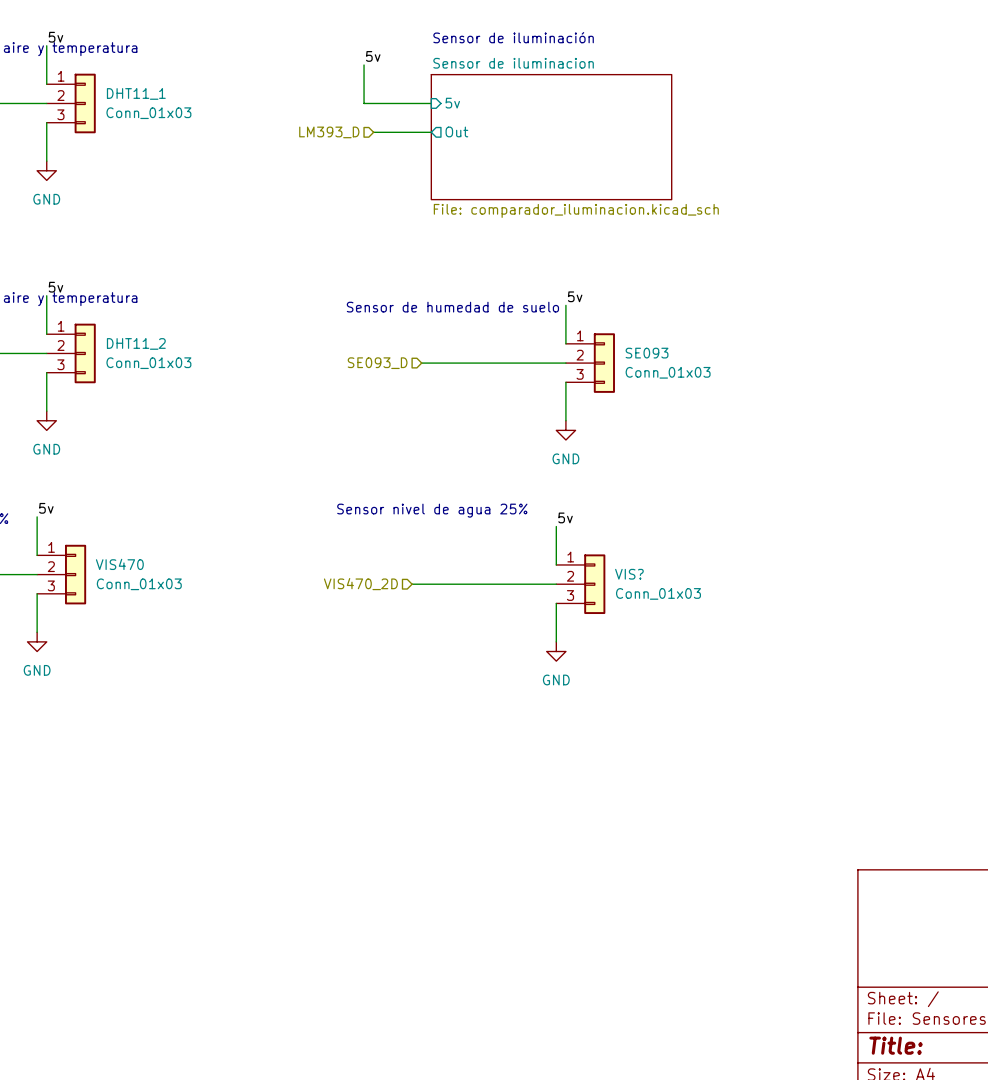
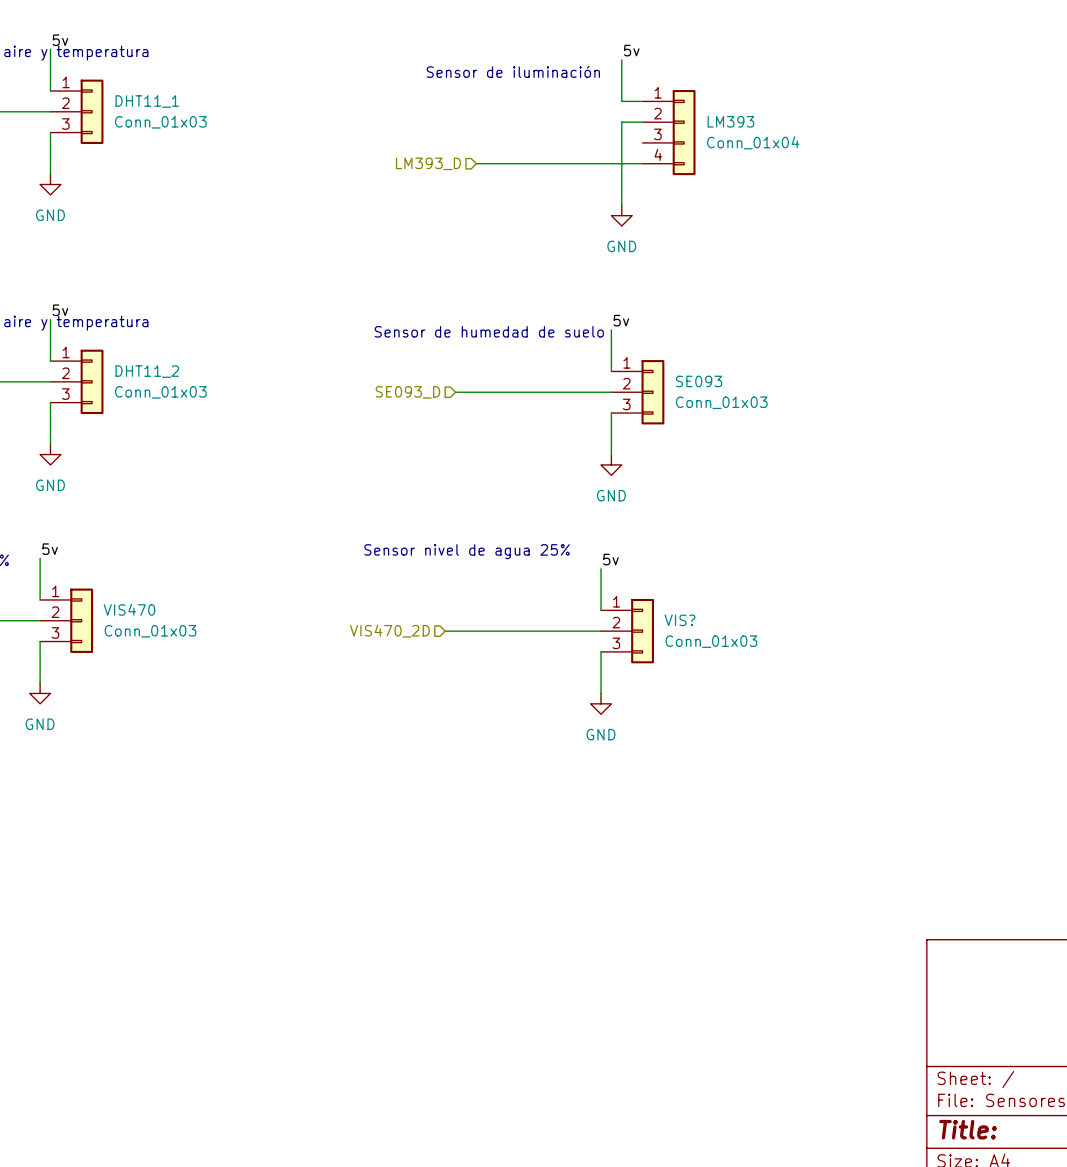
text position: Sensor de iluminación (513, 37) -> Sensor de iluminación (513, 71)
label: none -> 5v (631, 50)
wire: none -> (621, 59) (621, 101) (642, 101)
label: 5v (373, 56) -> none
wire: (364, 65) (364, 103) (431, 103) -> none
sheet pin: 5v (452, 103) -> none
wire: none -> (642, 122) (621, 122) (621, 205)
LM393: none -> Conn_01x04 (669, 132)
sheet pin: Out (456, 131) -> none
hierarchical label position: LM393_D (329, 132) -> LM393_D (428, 163)
wire: (373, 132) (431, 132) -> none
sheet Sensor de iluminacion: File: comparador_iluminacion.kicad_sch (551, 137) -> none
wire: none -> (476, 163) (642, 163)
power symbol: none -> GND (621, 215)

